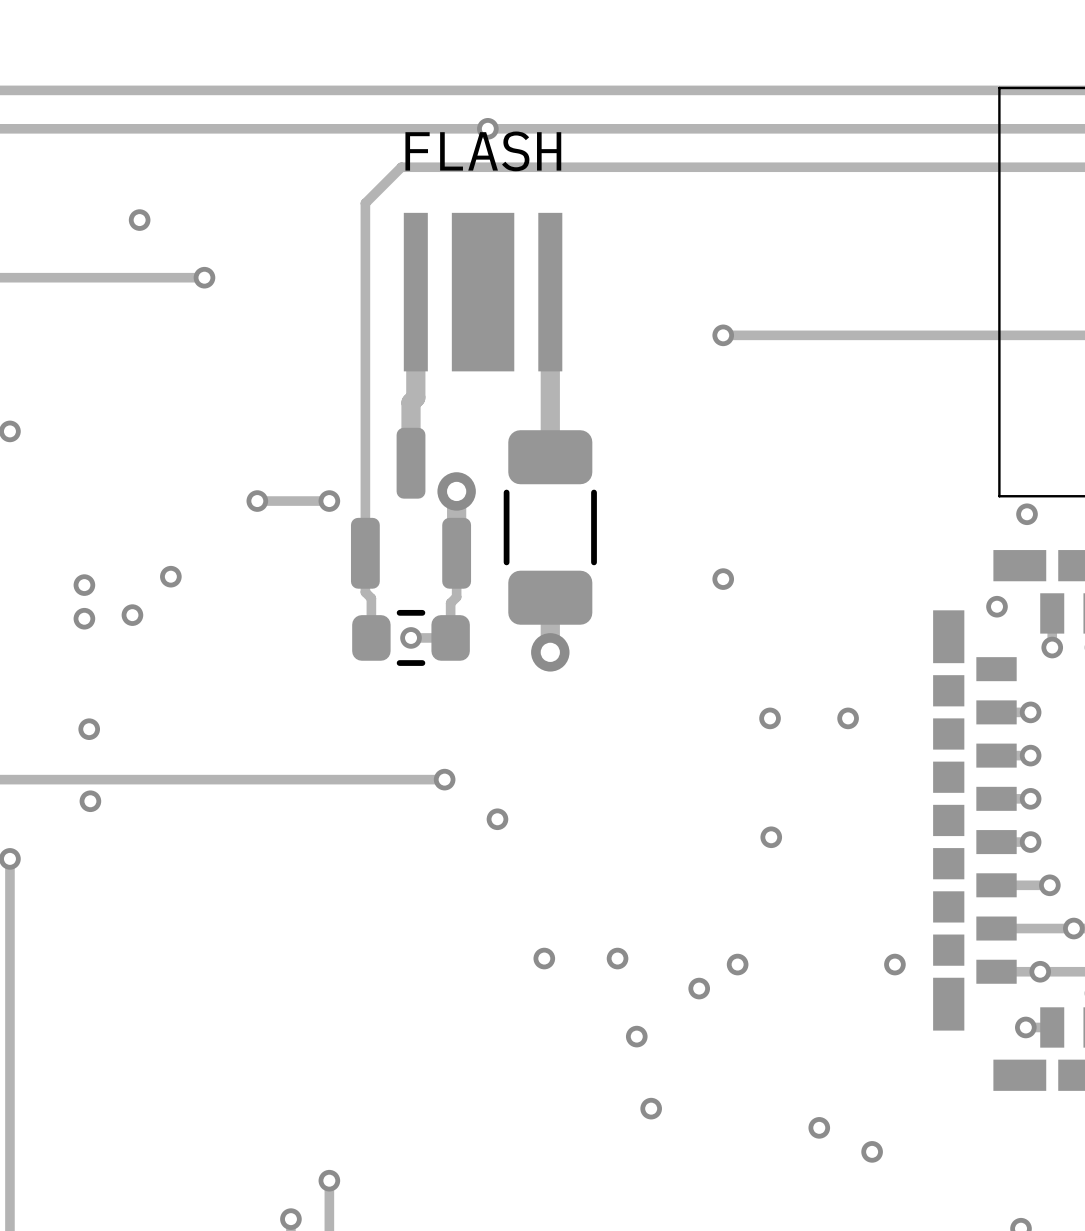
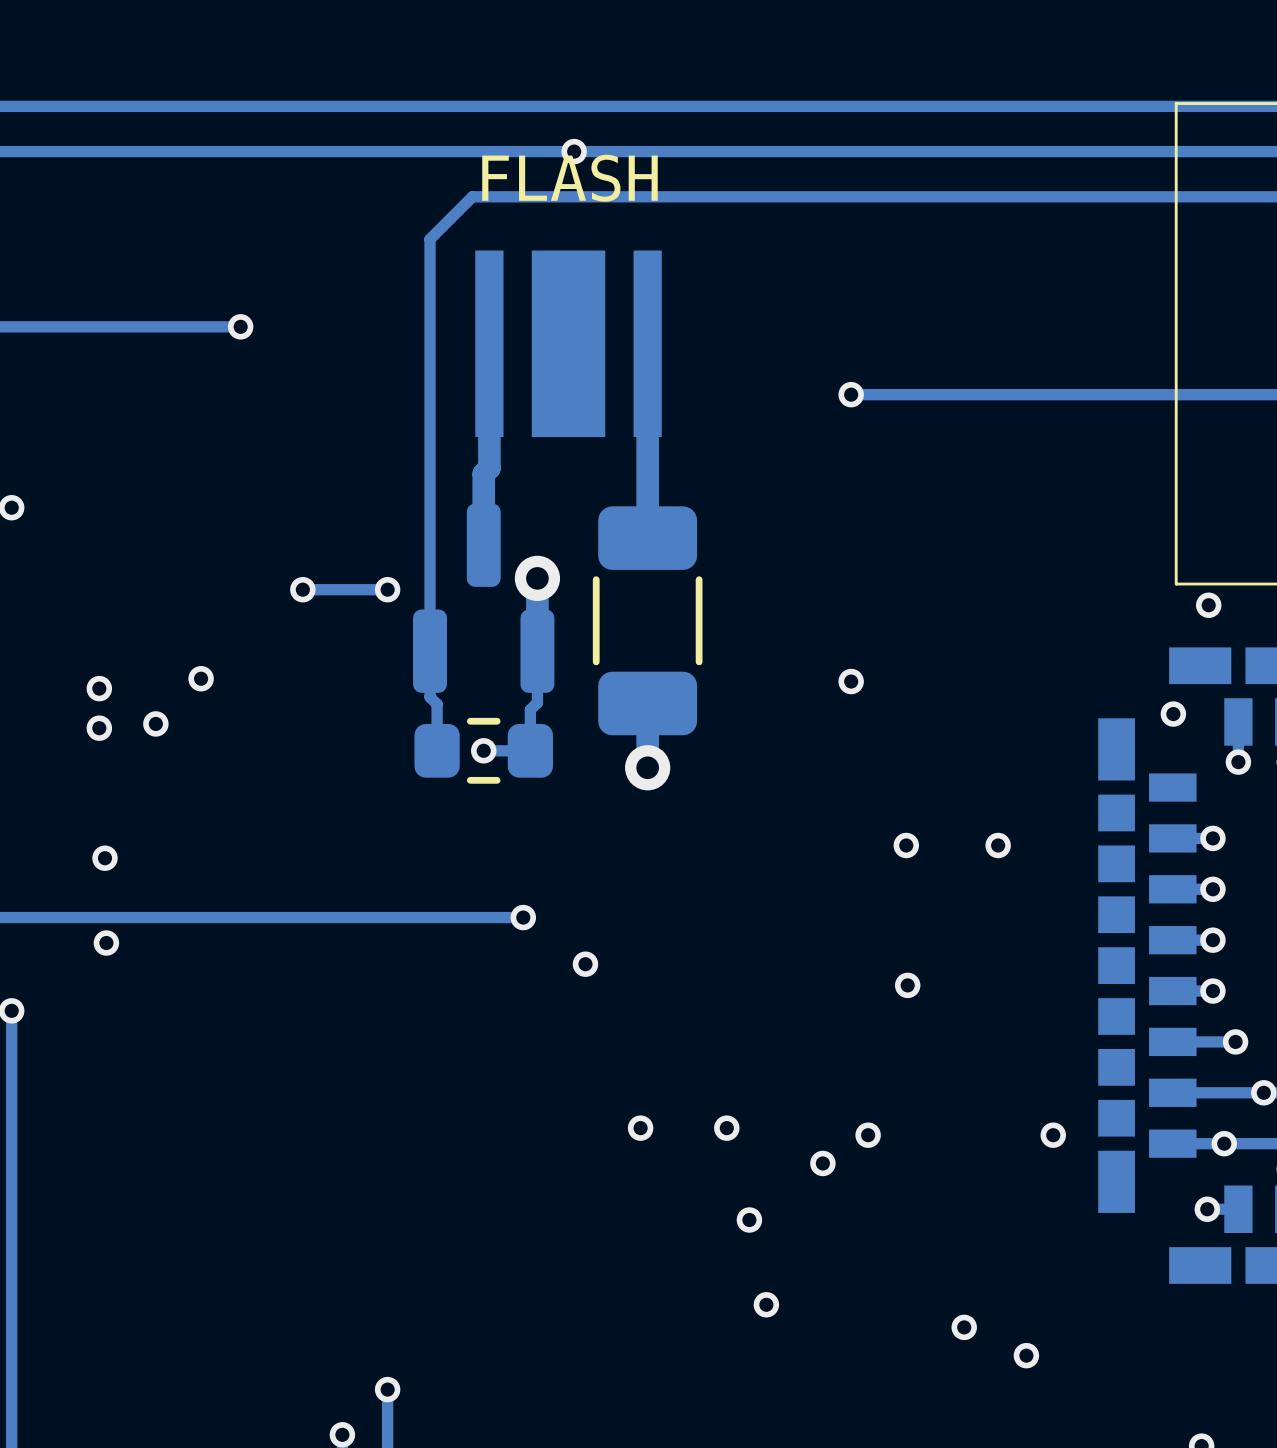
via: (139, 220) -> none

